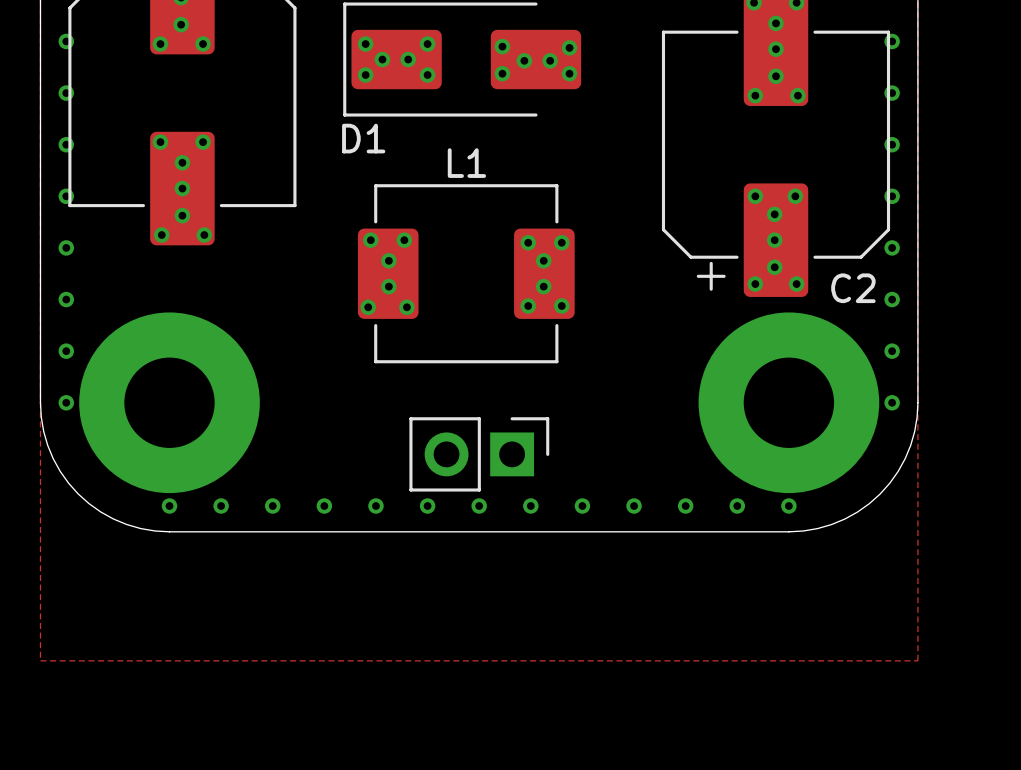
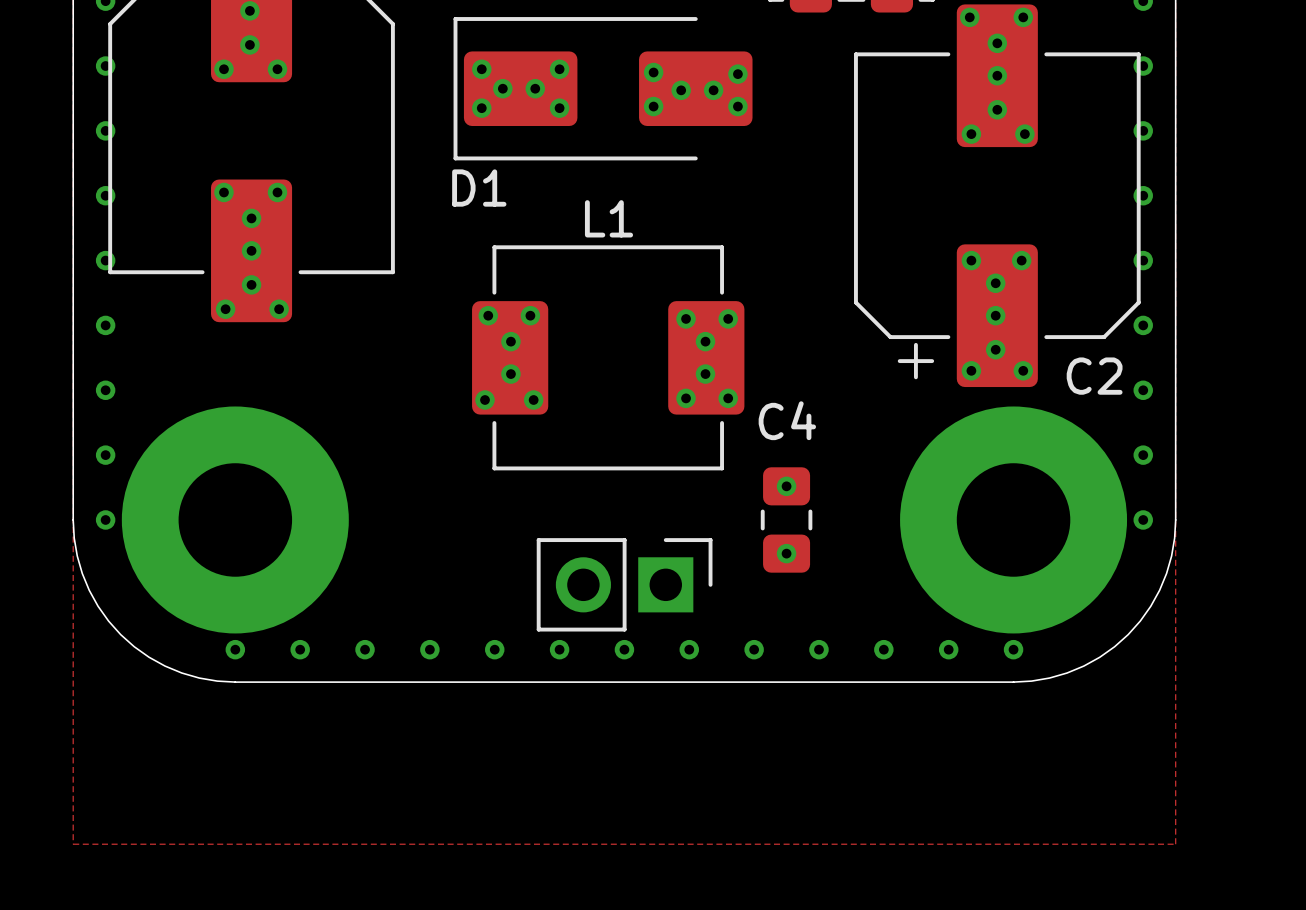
via: none -> (786, 486)
C4: none -> (786, 519)
via: none -> (786, 553)

